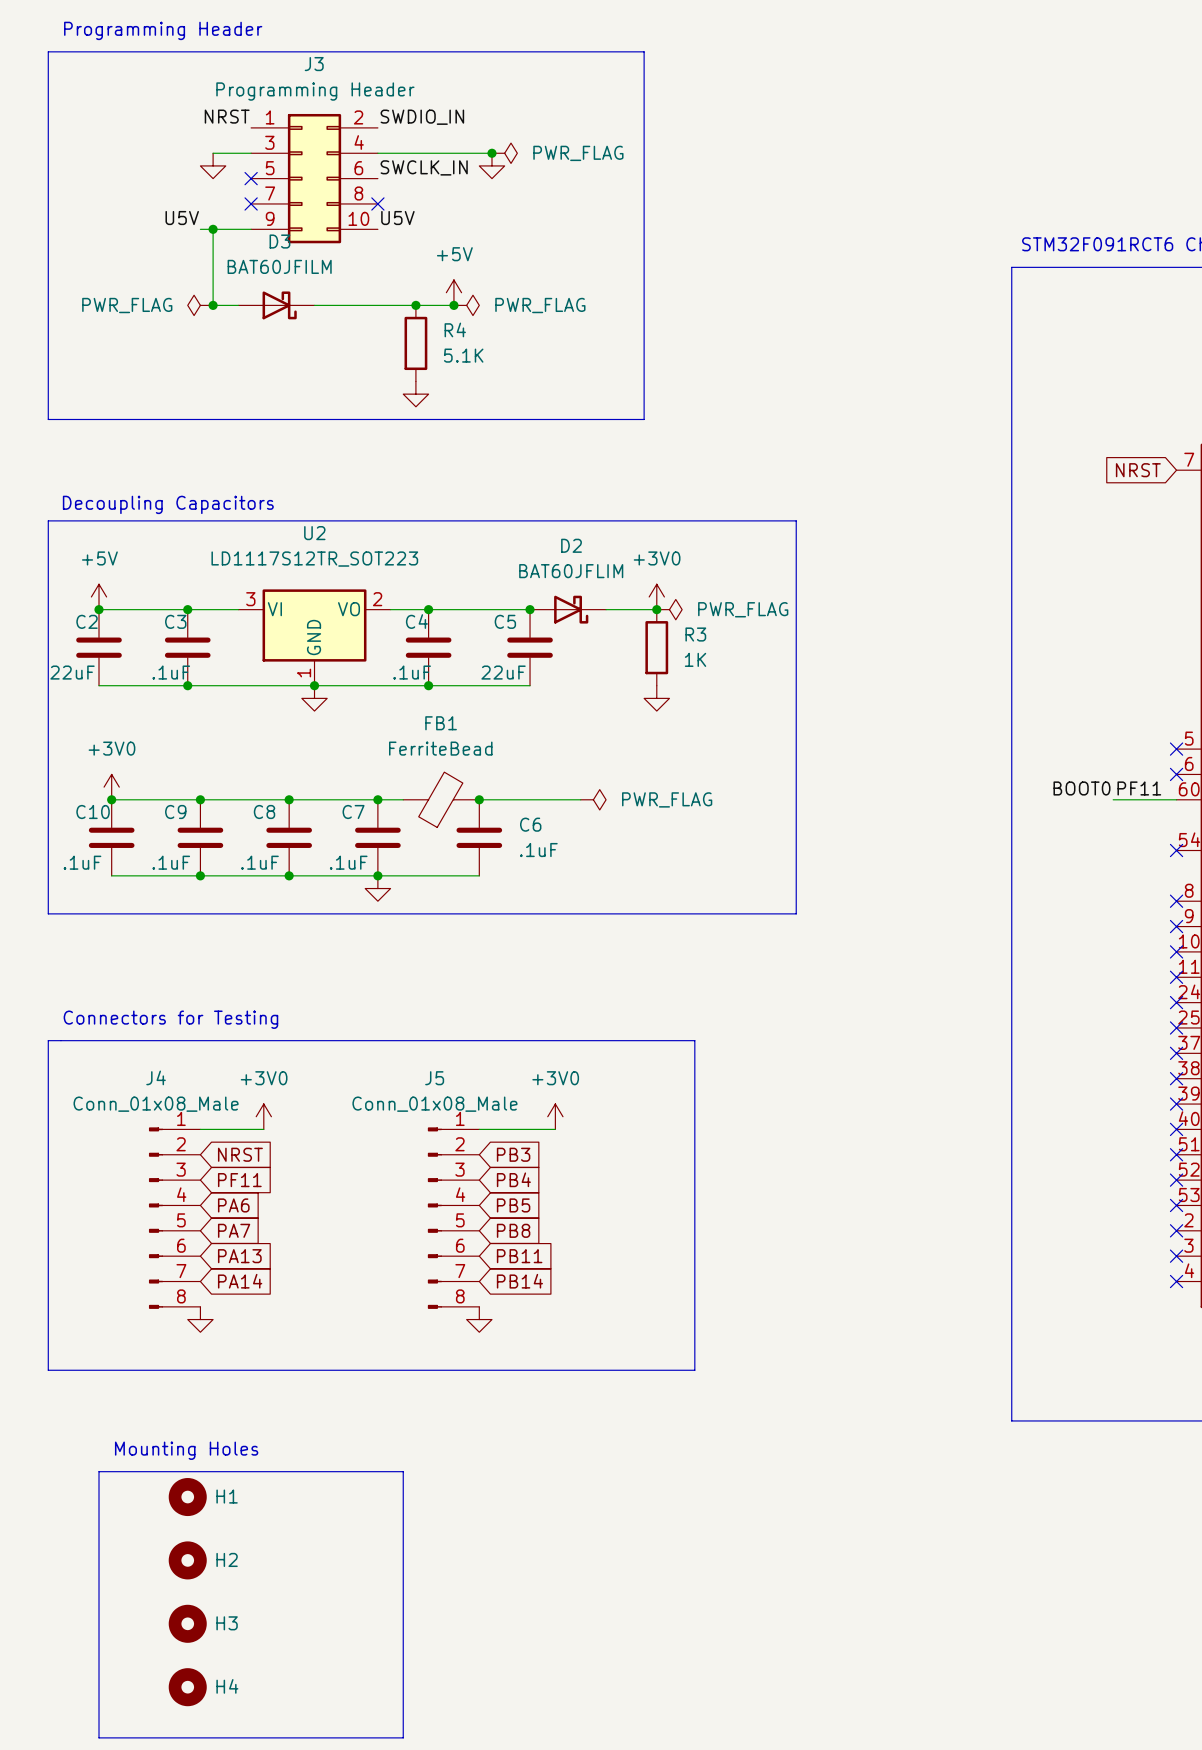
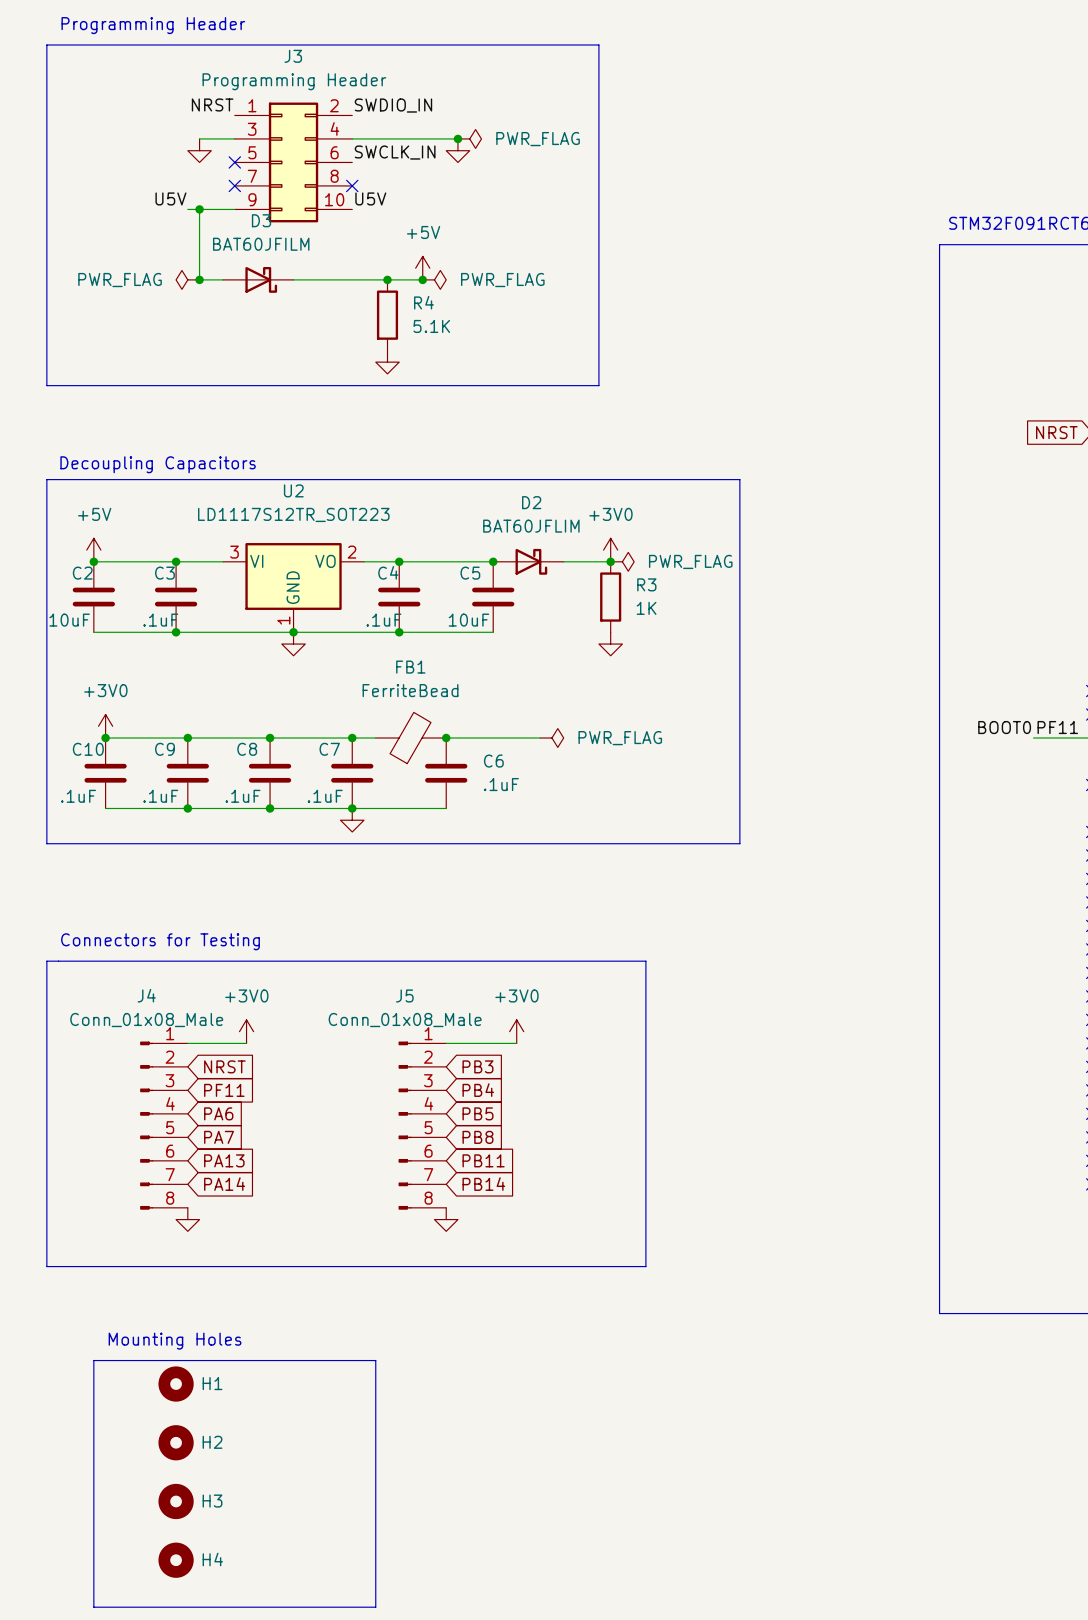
C2 value: 22uF (72, 672) -> 10uF (69, 620)
C5 value: 22uF (503, 672) -> 10uF (468, 620)

